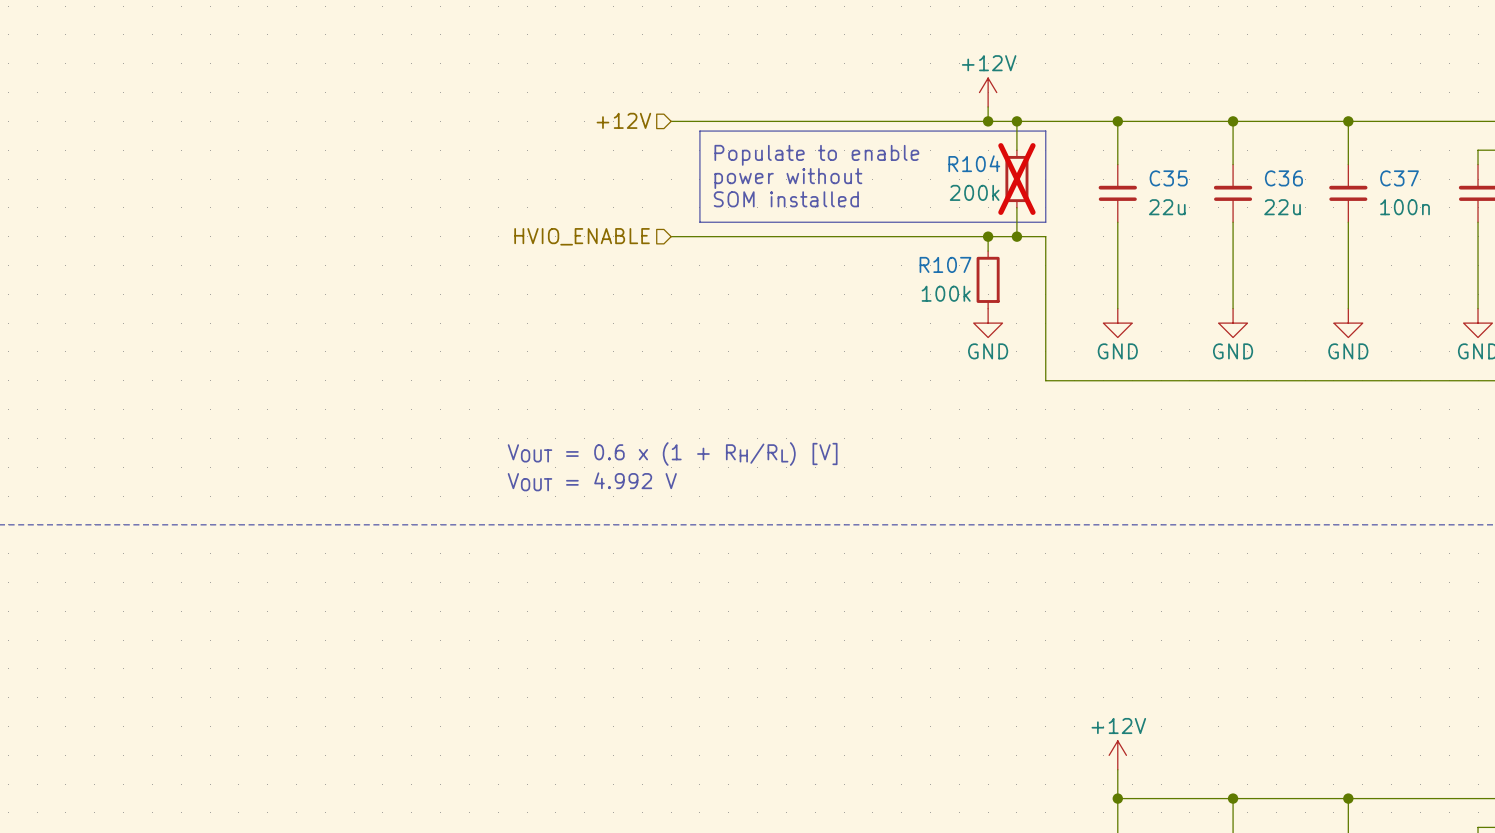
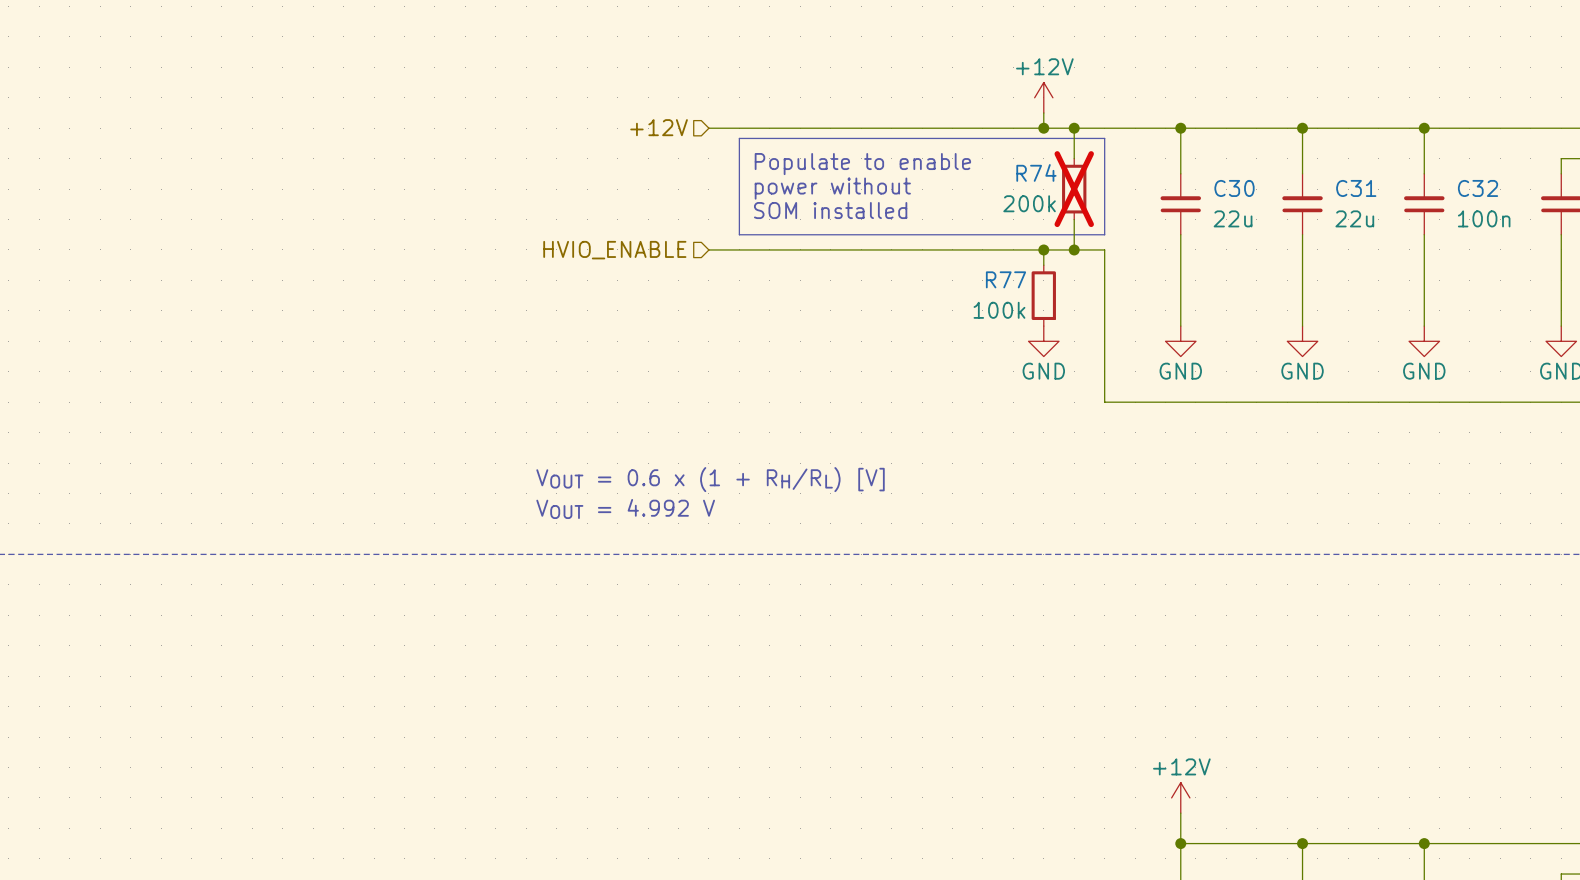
R104 name: R104 (974, 163) -> R74 (1036, 172)
C35 name: C35 (1168, 178) -> C30 (1234, 188)
C36 name: C36 (1283, 178) -> C31 (1356, 188)
C37 name: C37 (1399, 178) -> C32 (1478, 188)
R107 name: R107 (945, 264) -> R77 (1006, 279)

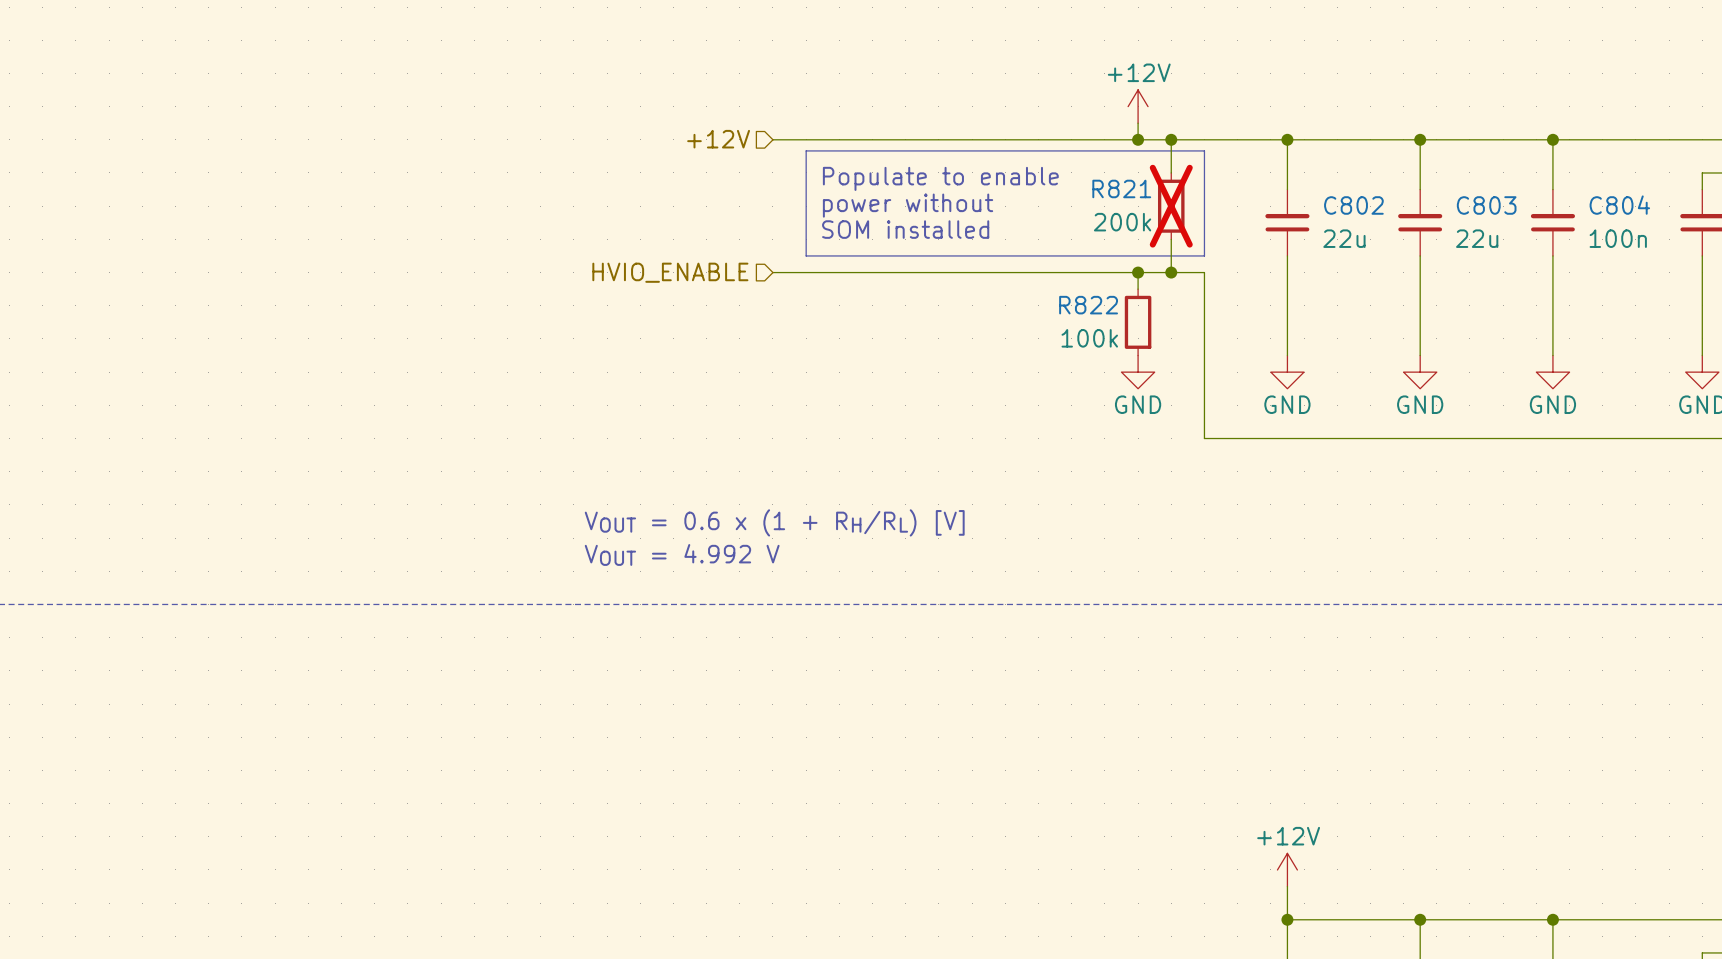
R74 name: R74 (1036, 172) -> R821 (1121, 188)
C30 name: C30 (1234, 188) -> C802 (1353, 205)
C31 name: C31 (1356, 188) -> C803 (1486, 205)
C32 name: C32 (1478, 188) -> C804 (1619, 205)
R77 name: R77 (1006, 279) -> R822 (1088, 305)

